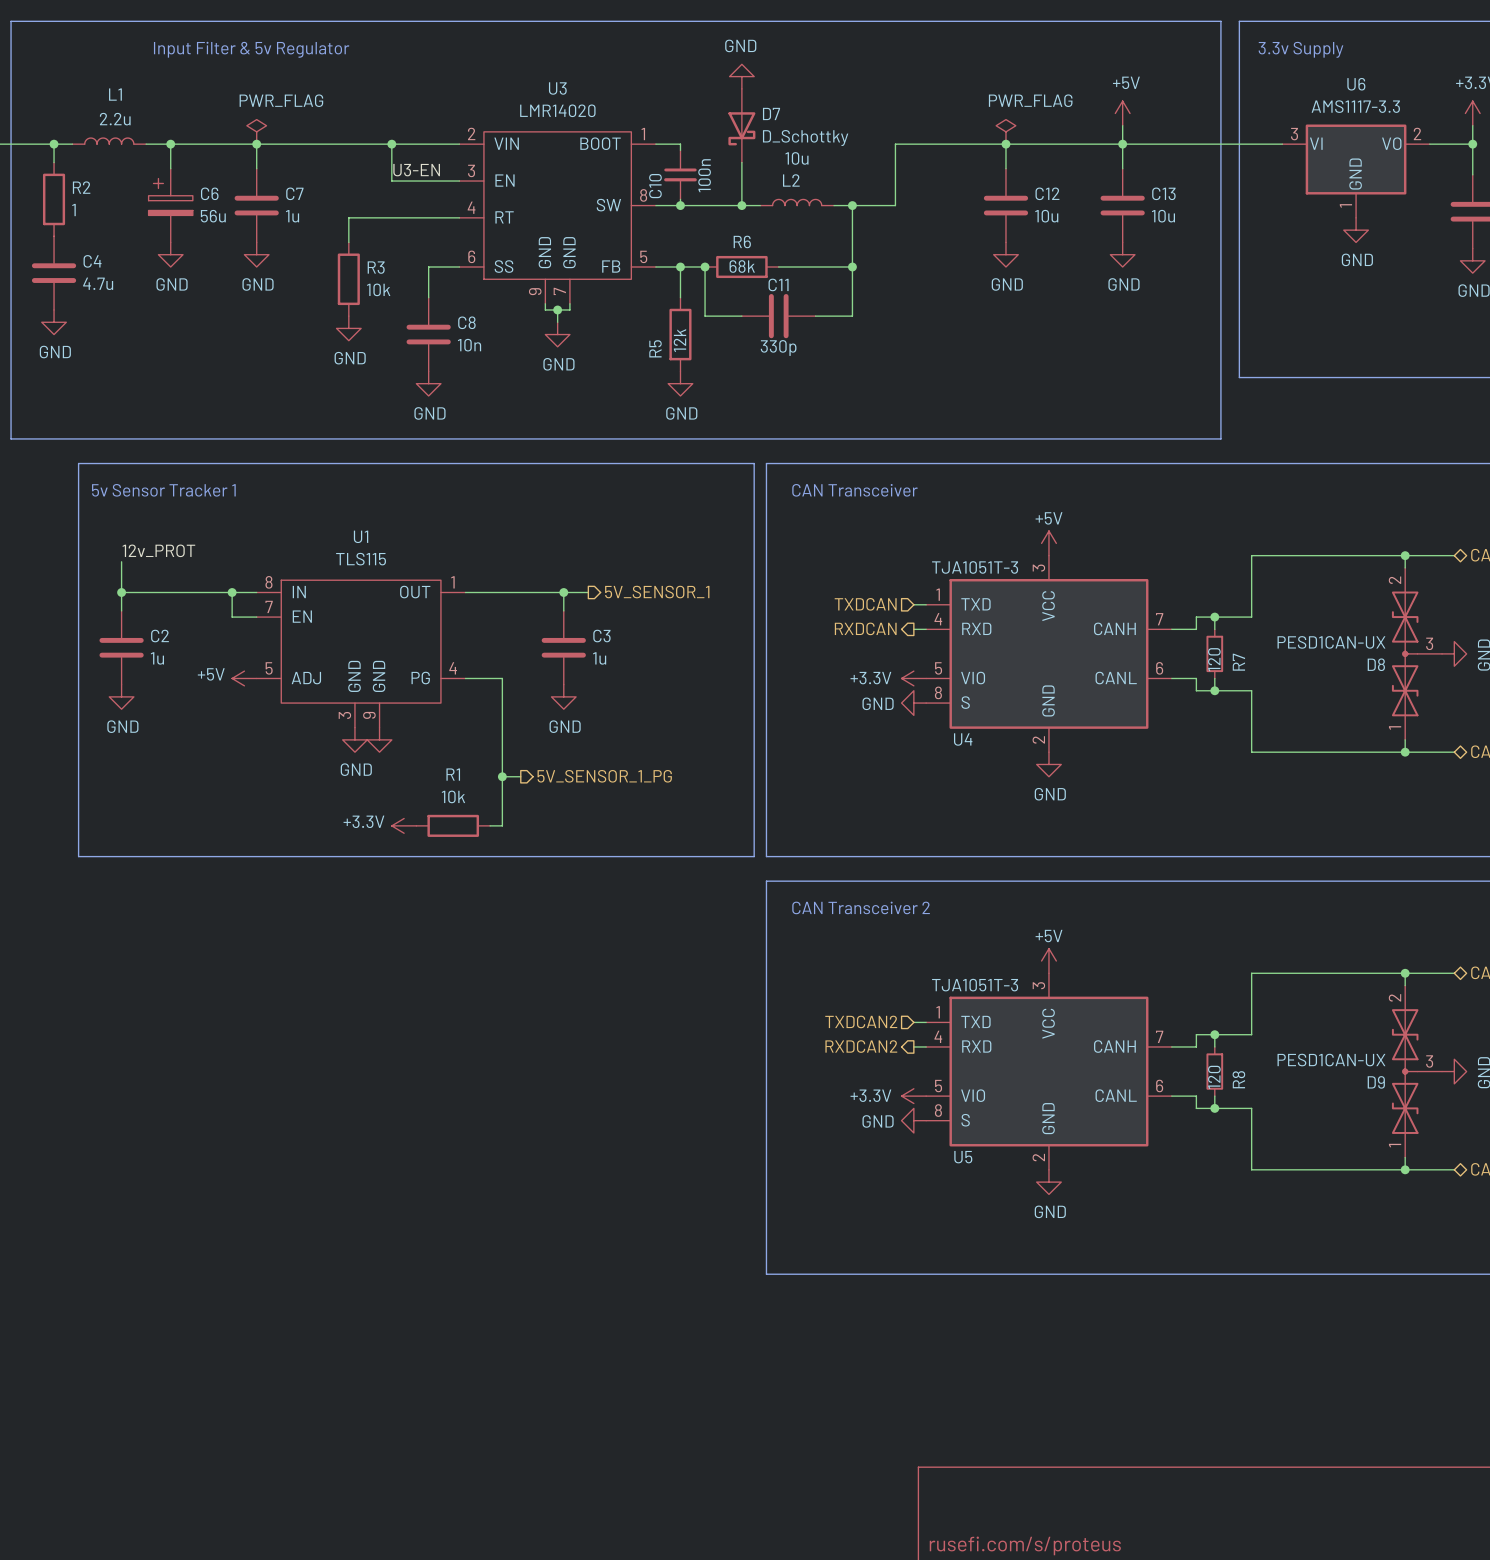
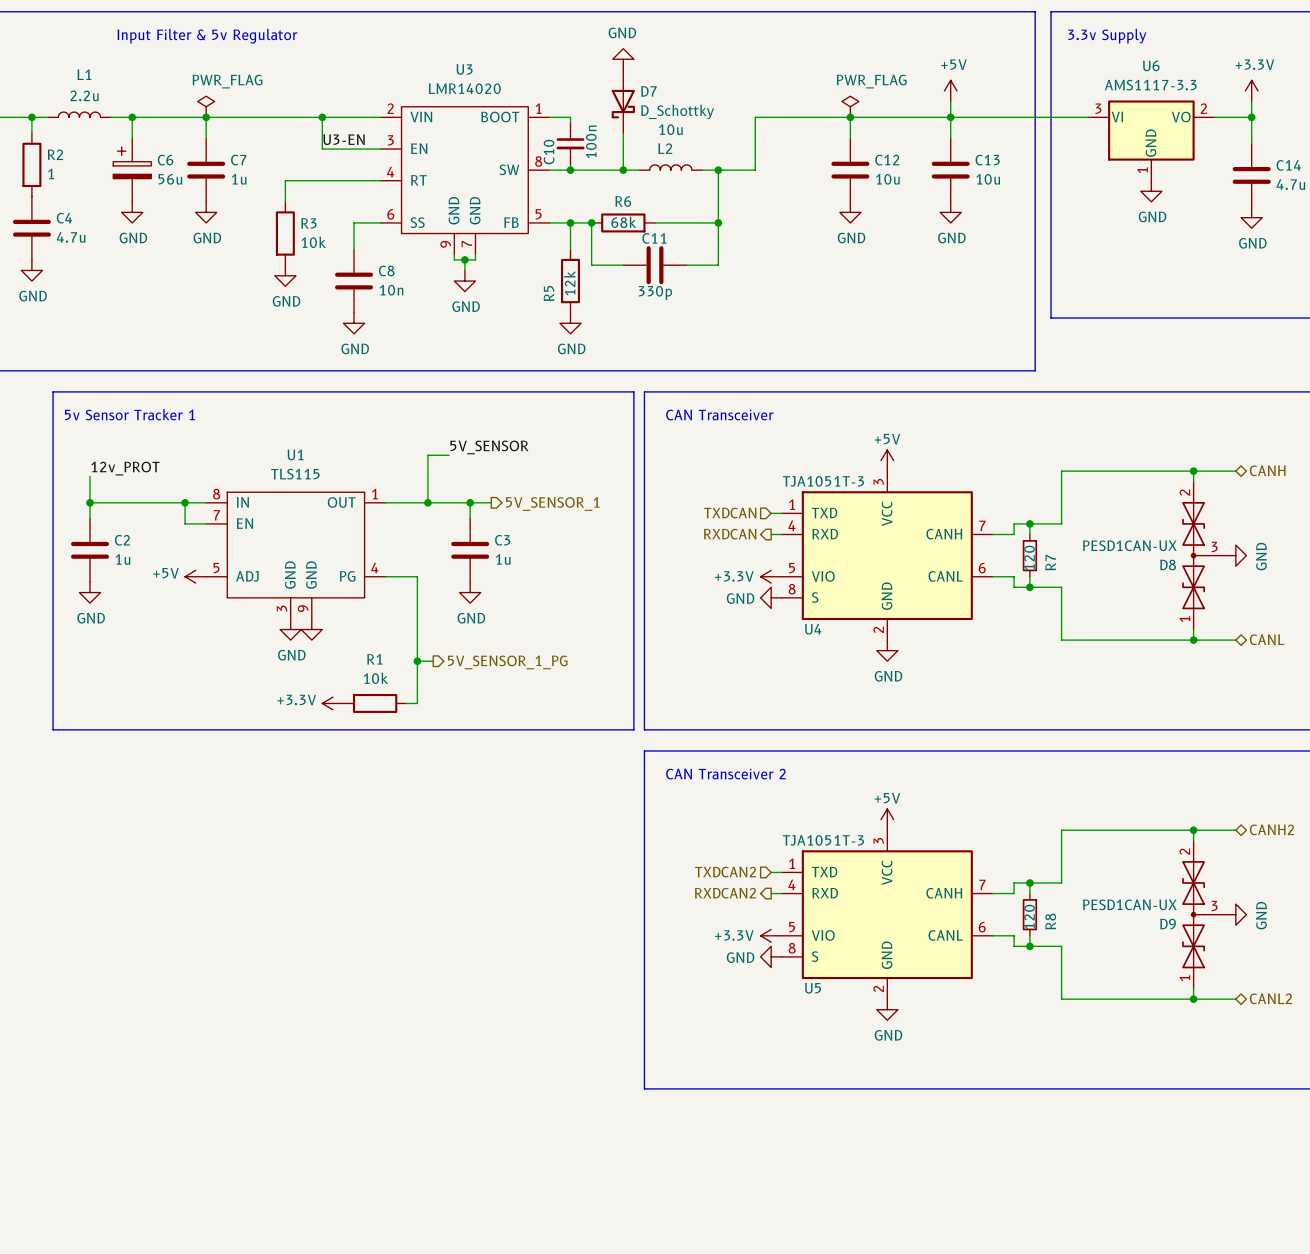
label: none -> 5V_SENSOR (489, 447)
wire: none -> (449, 455) (427, 455) (427, 502)
junction: none -> (427, 502)

